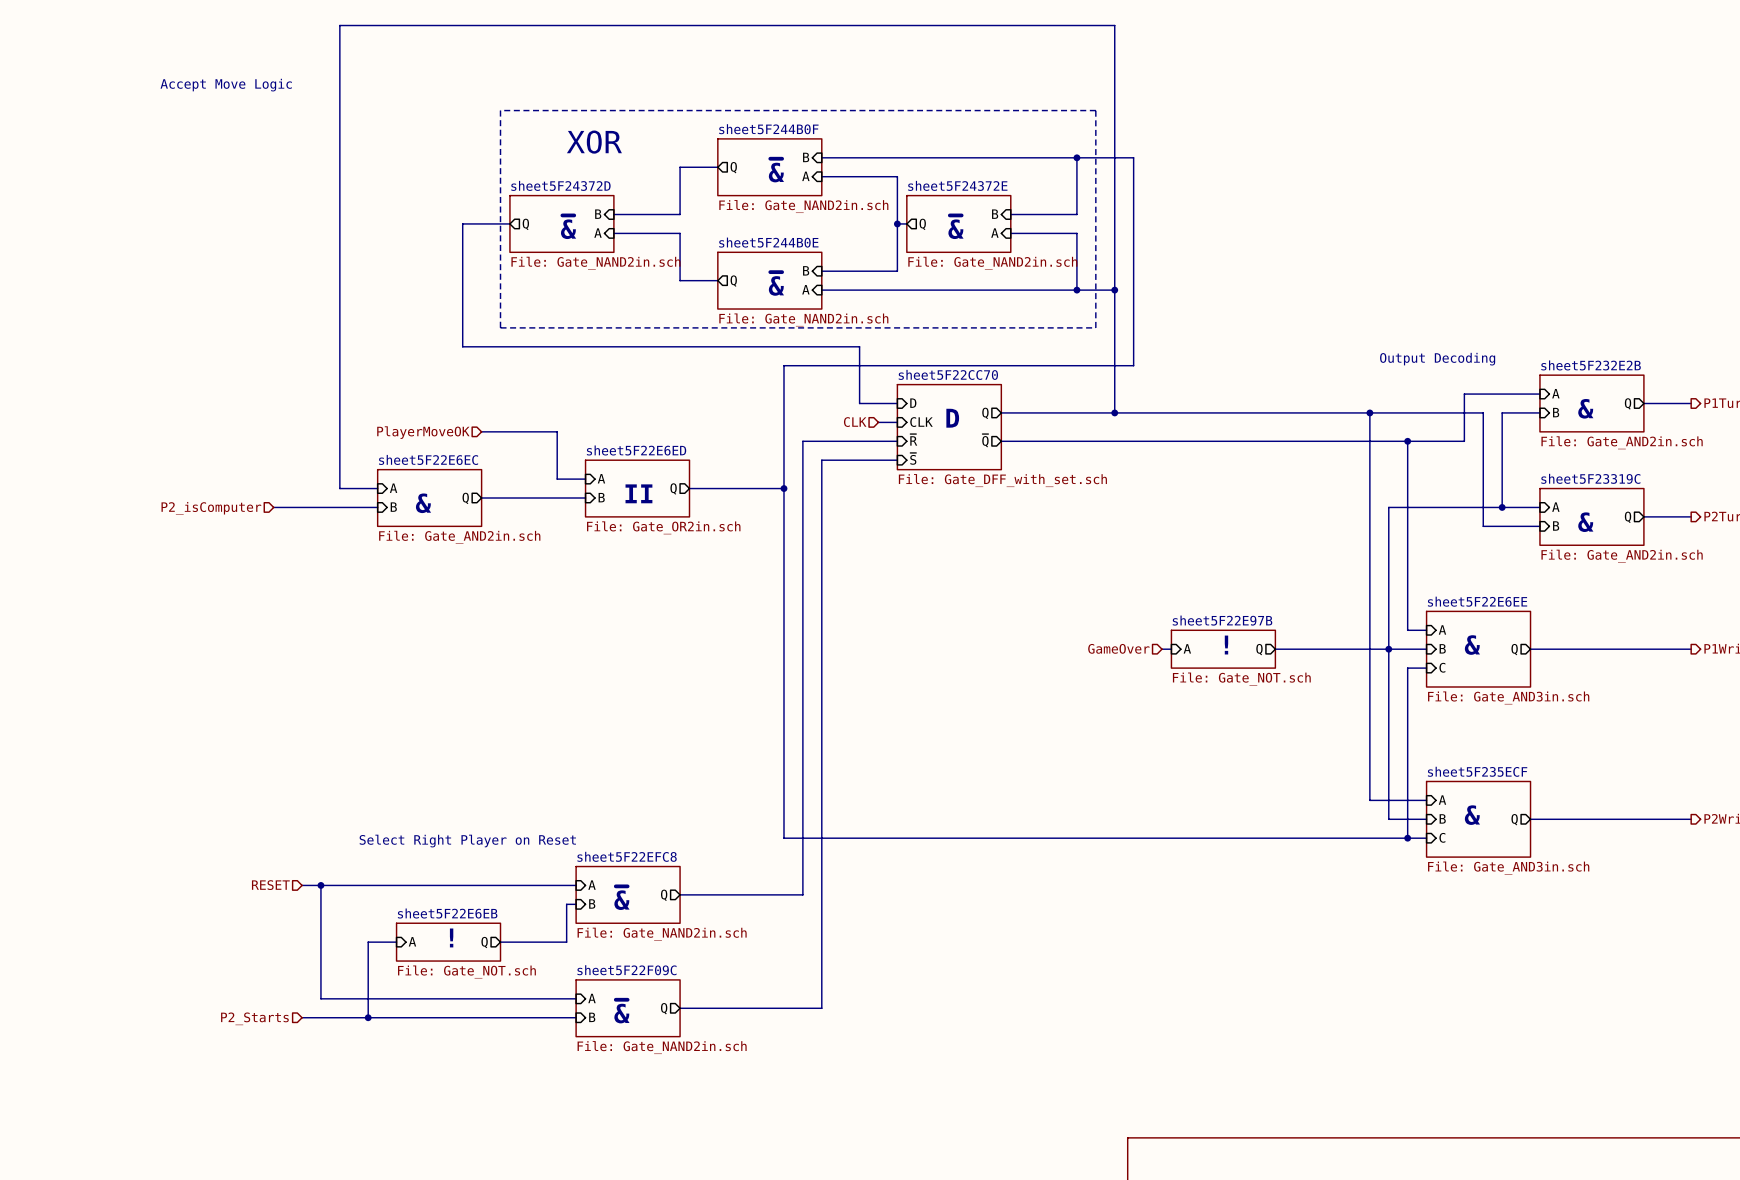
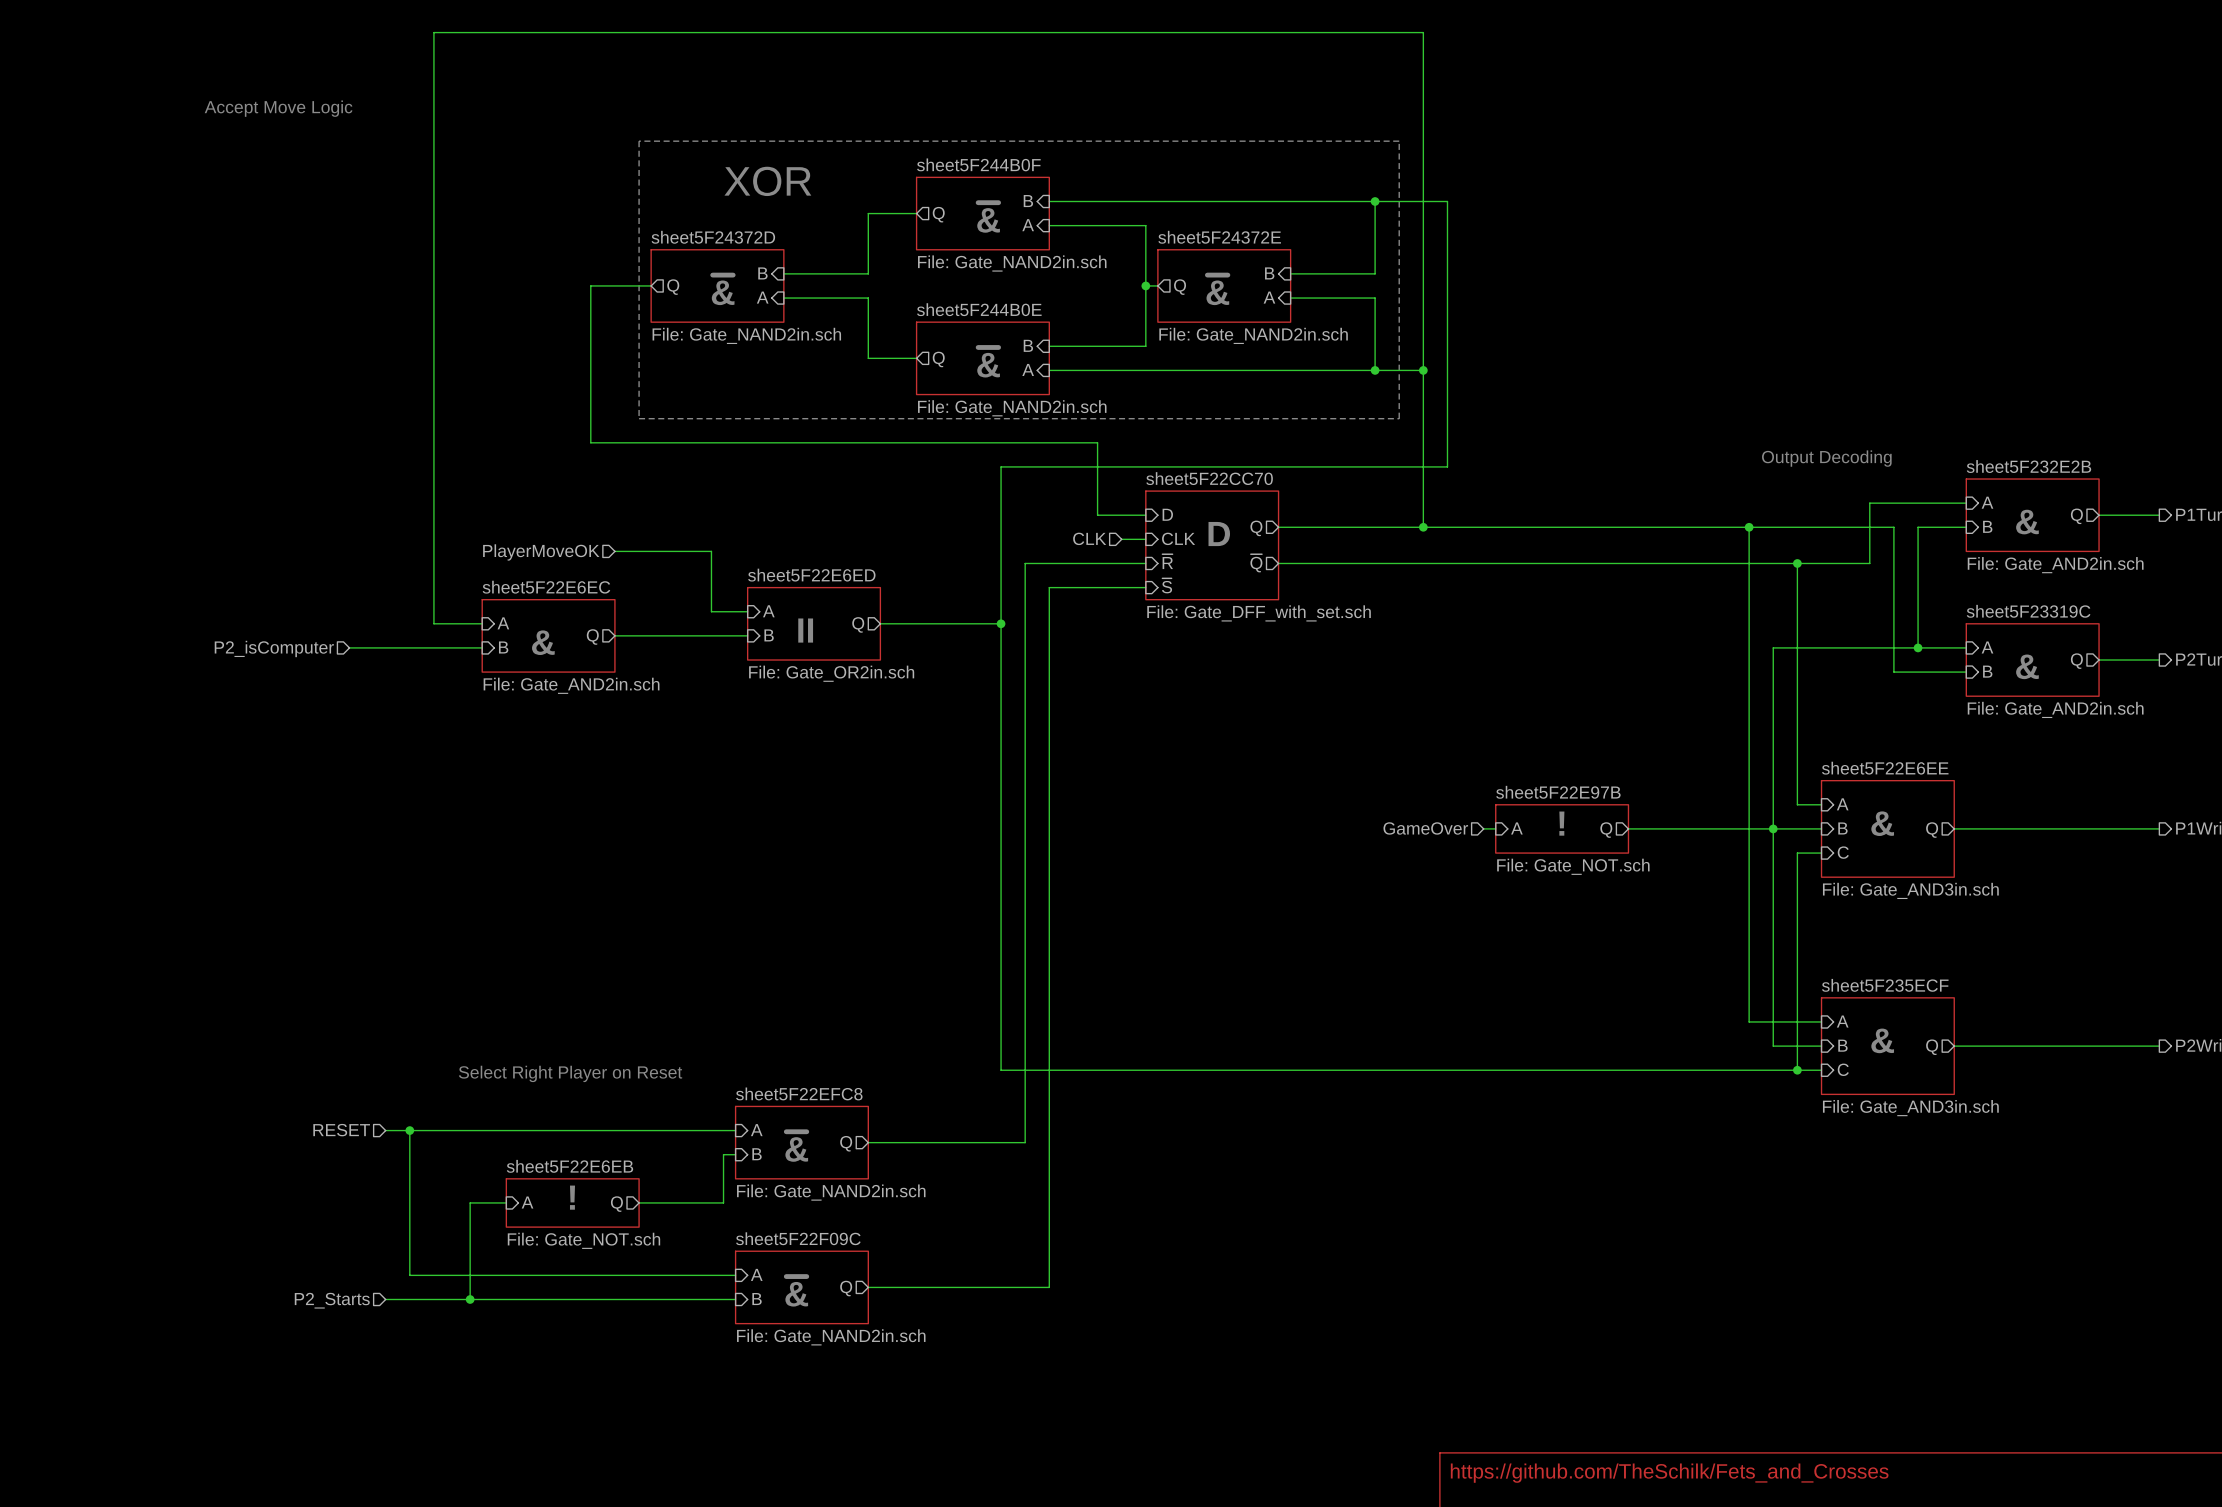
title block: none -> https://github.com/TheSchilk/Fets_and_Crosses (1669, 1473)

